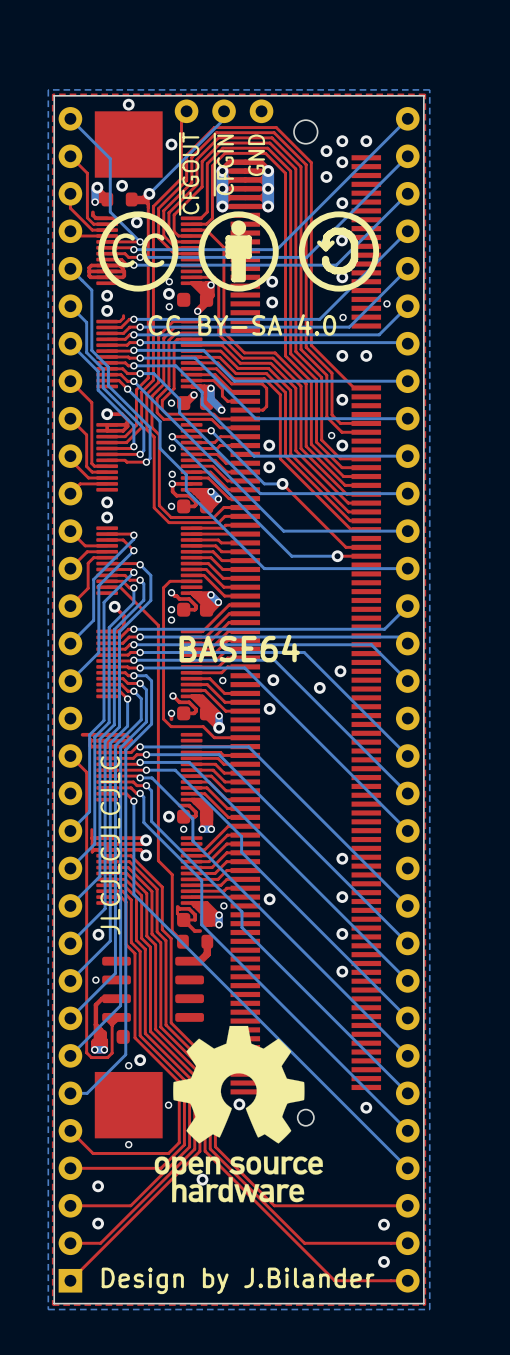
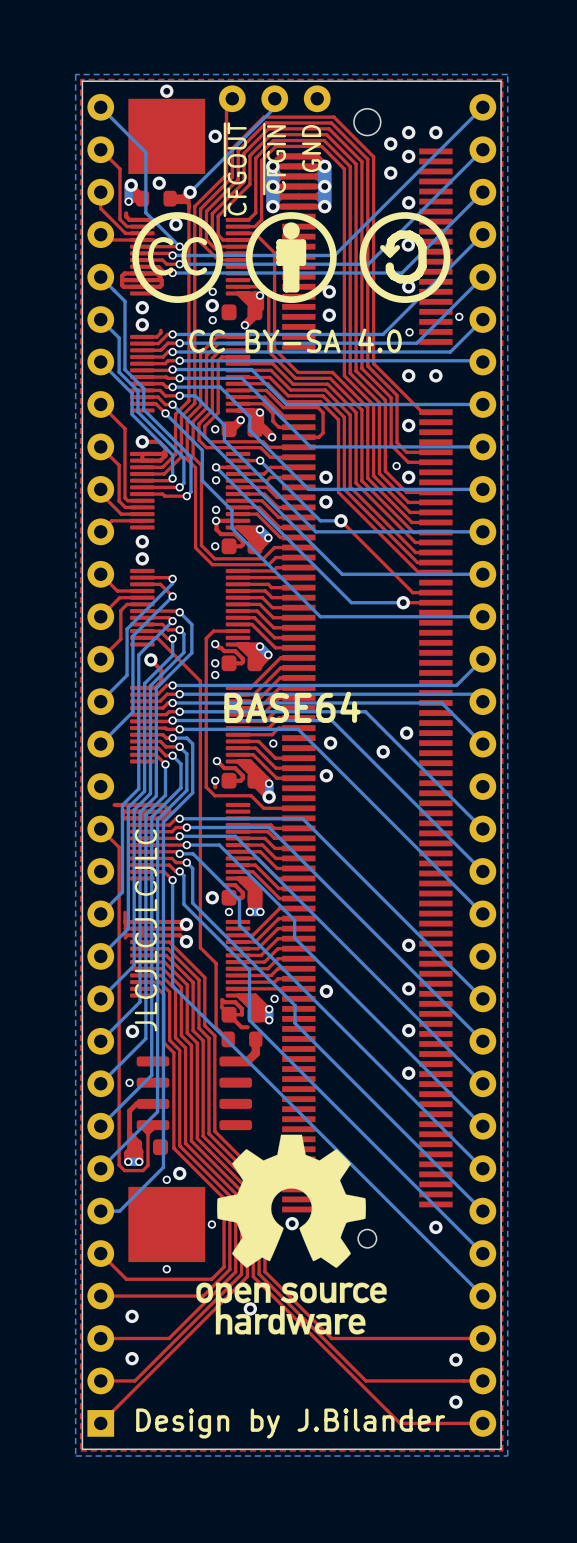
bottom track: (210, 388) (210, 399) (221, 410) -> none

